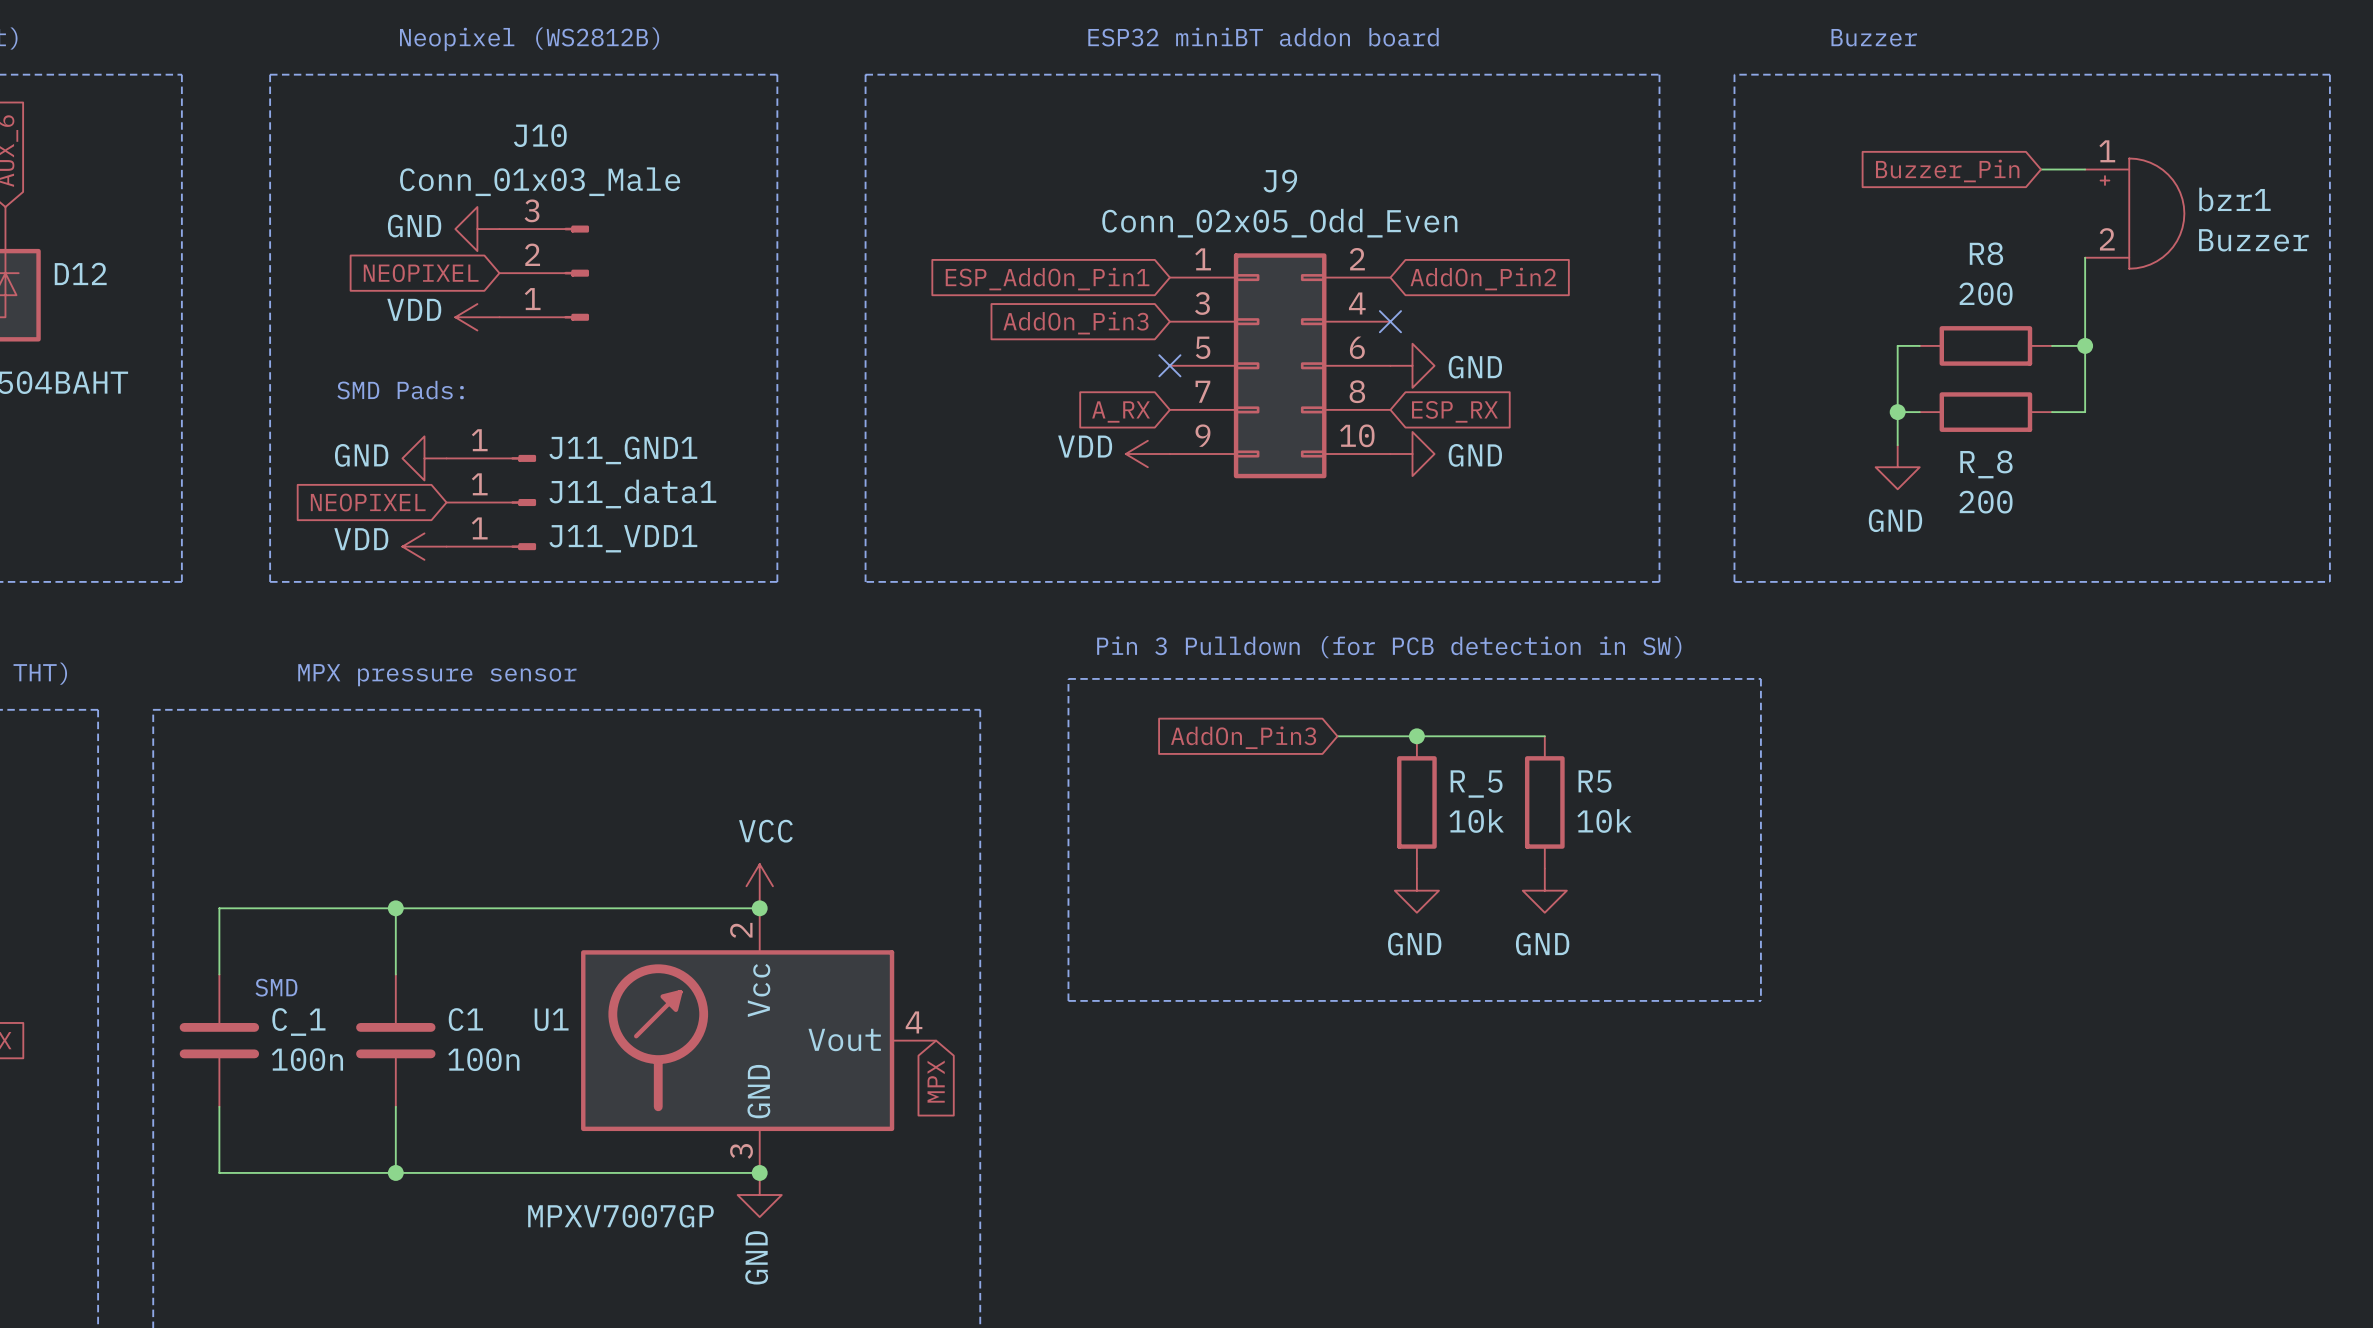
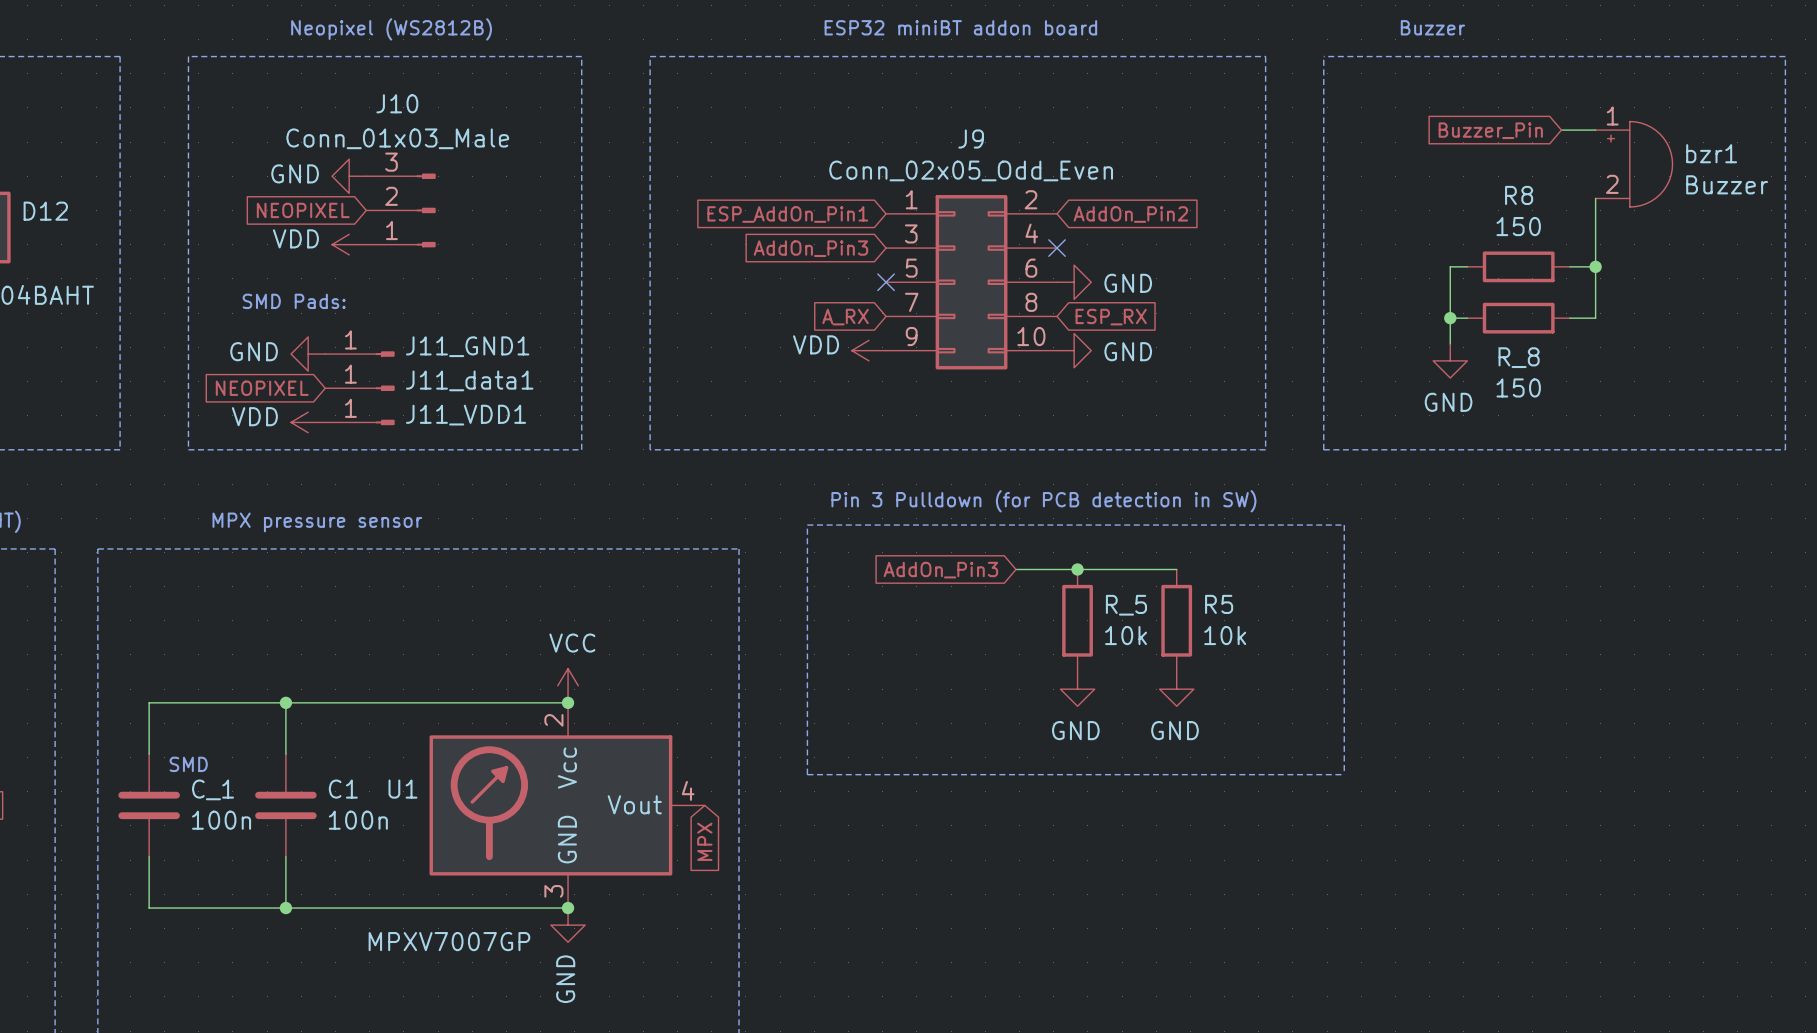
R8 value: 200 (1986, 293) -> 150 (1518, 226)
R_8 value: 200 (1986, 502) -> 150 (1518, 387)

